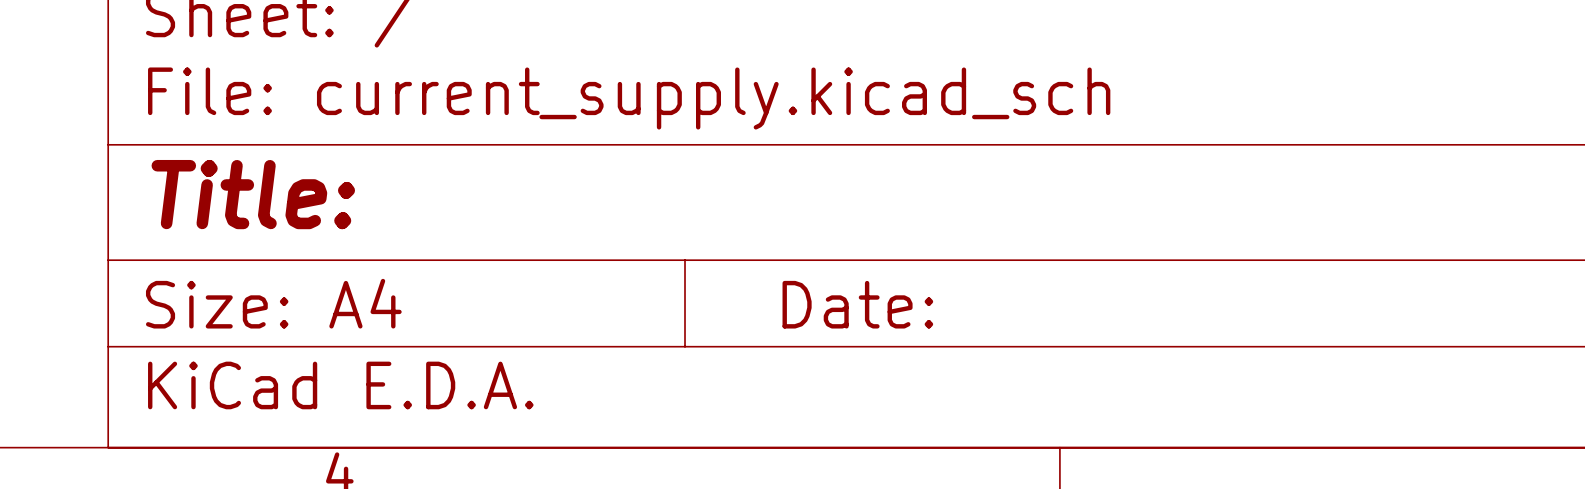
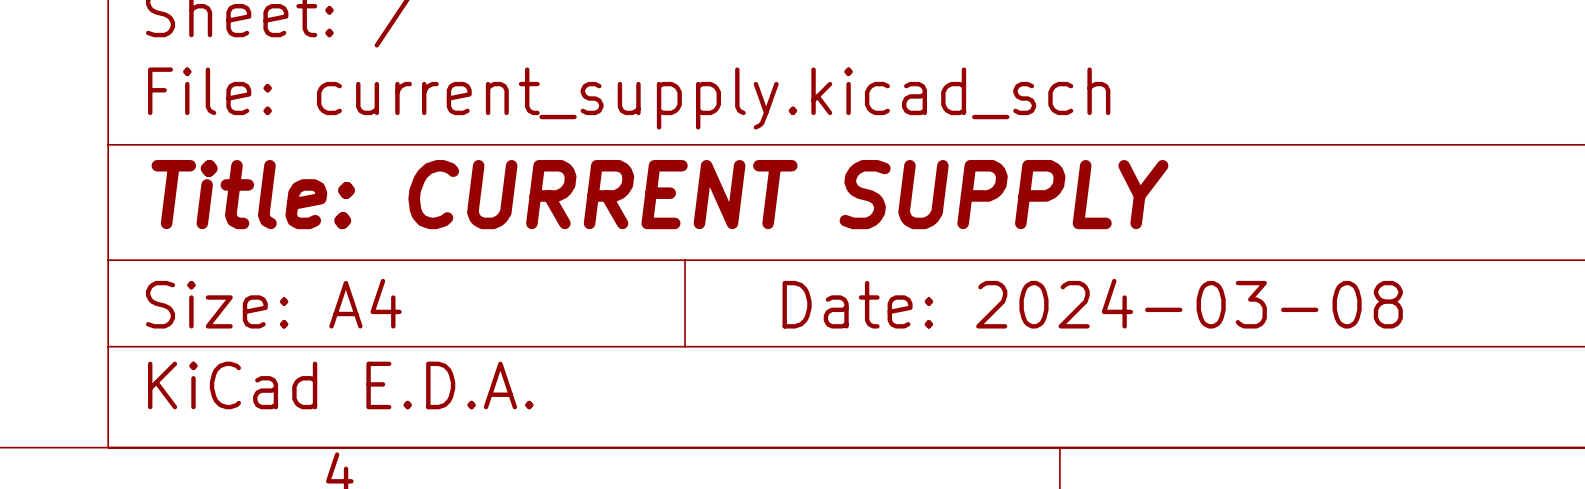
title block: Title: (253, 194) -> Title: CURRENT SUPPLY (659, 194)
title block: Date: (857, 304) -> Date: 2024-03-08 (1092, 303)

